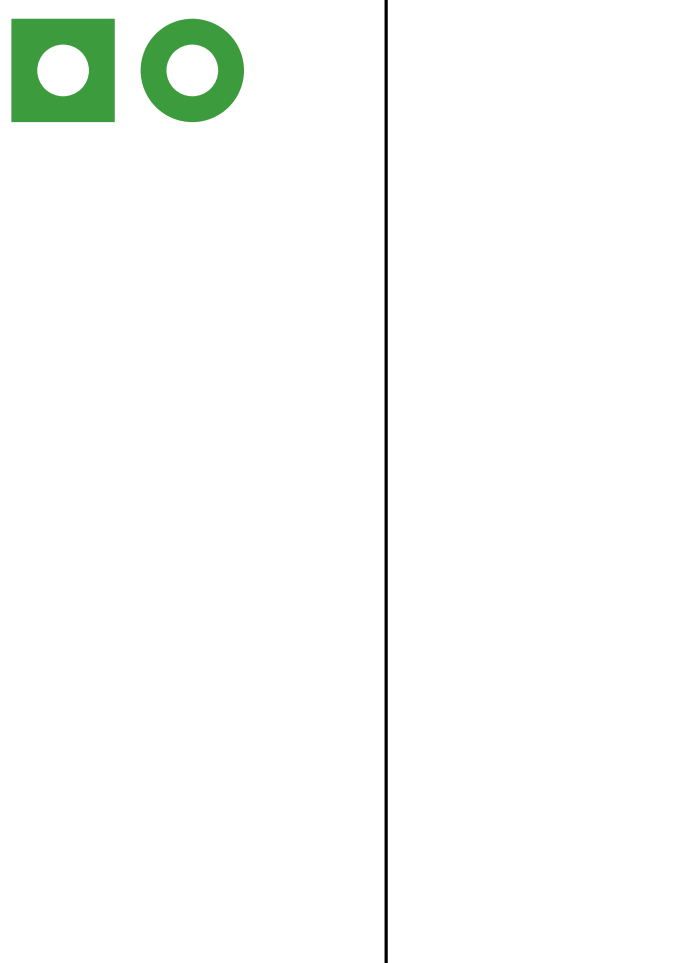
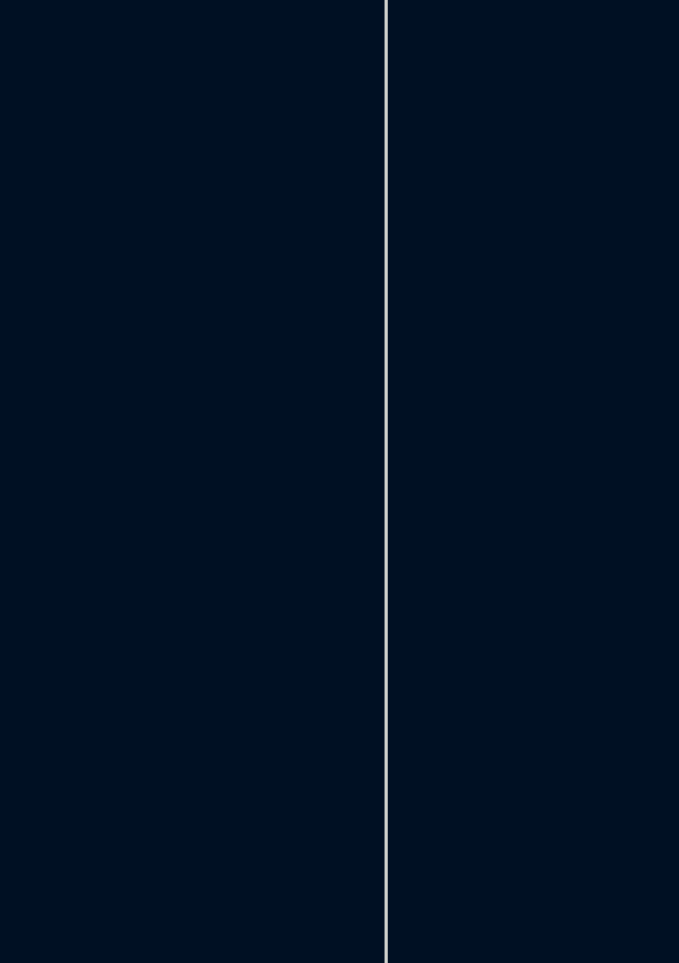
part: (127, 70) -> none

